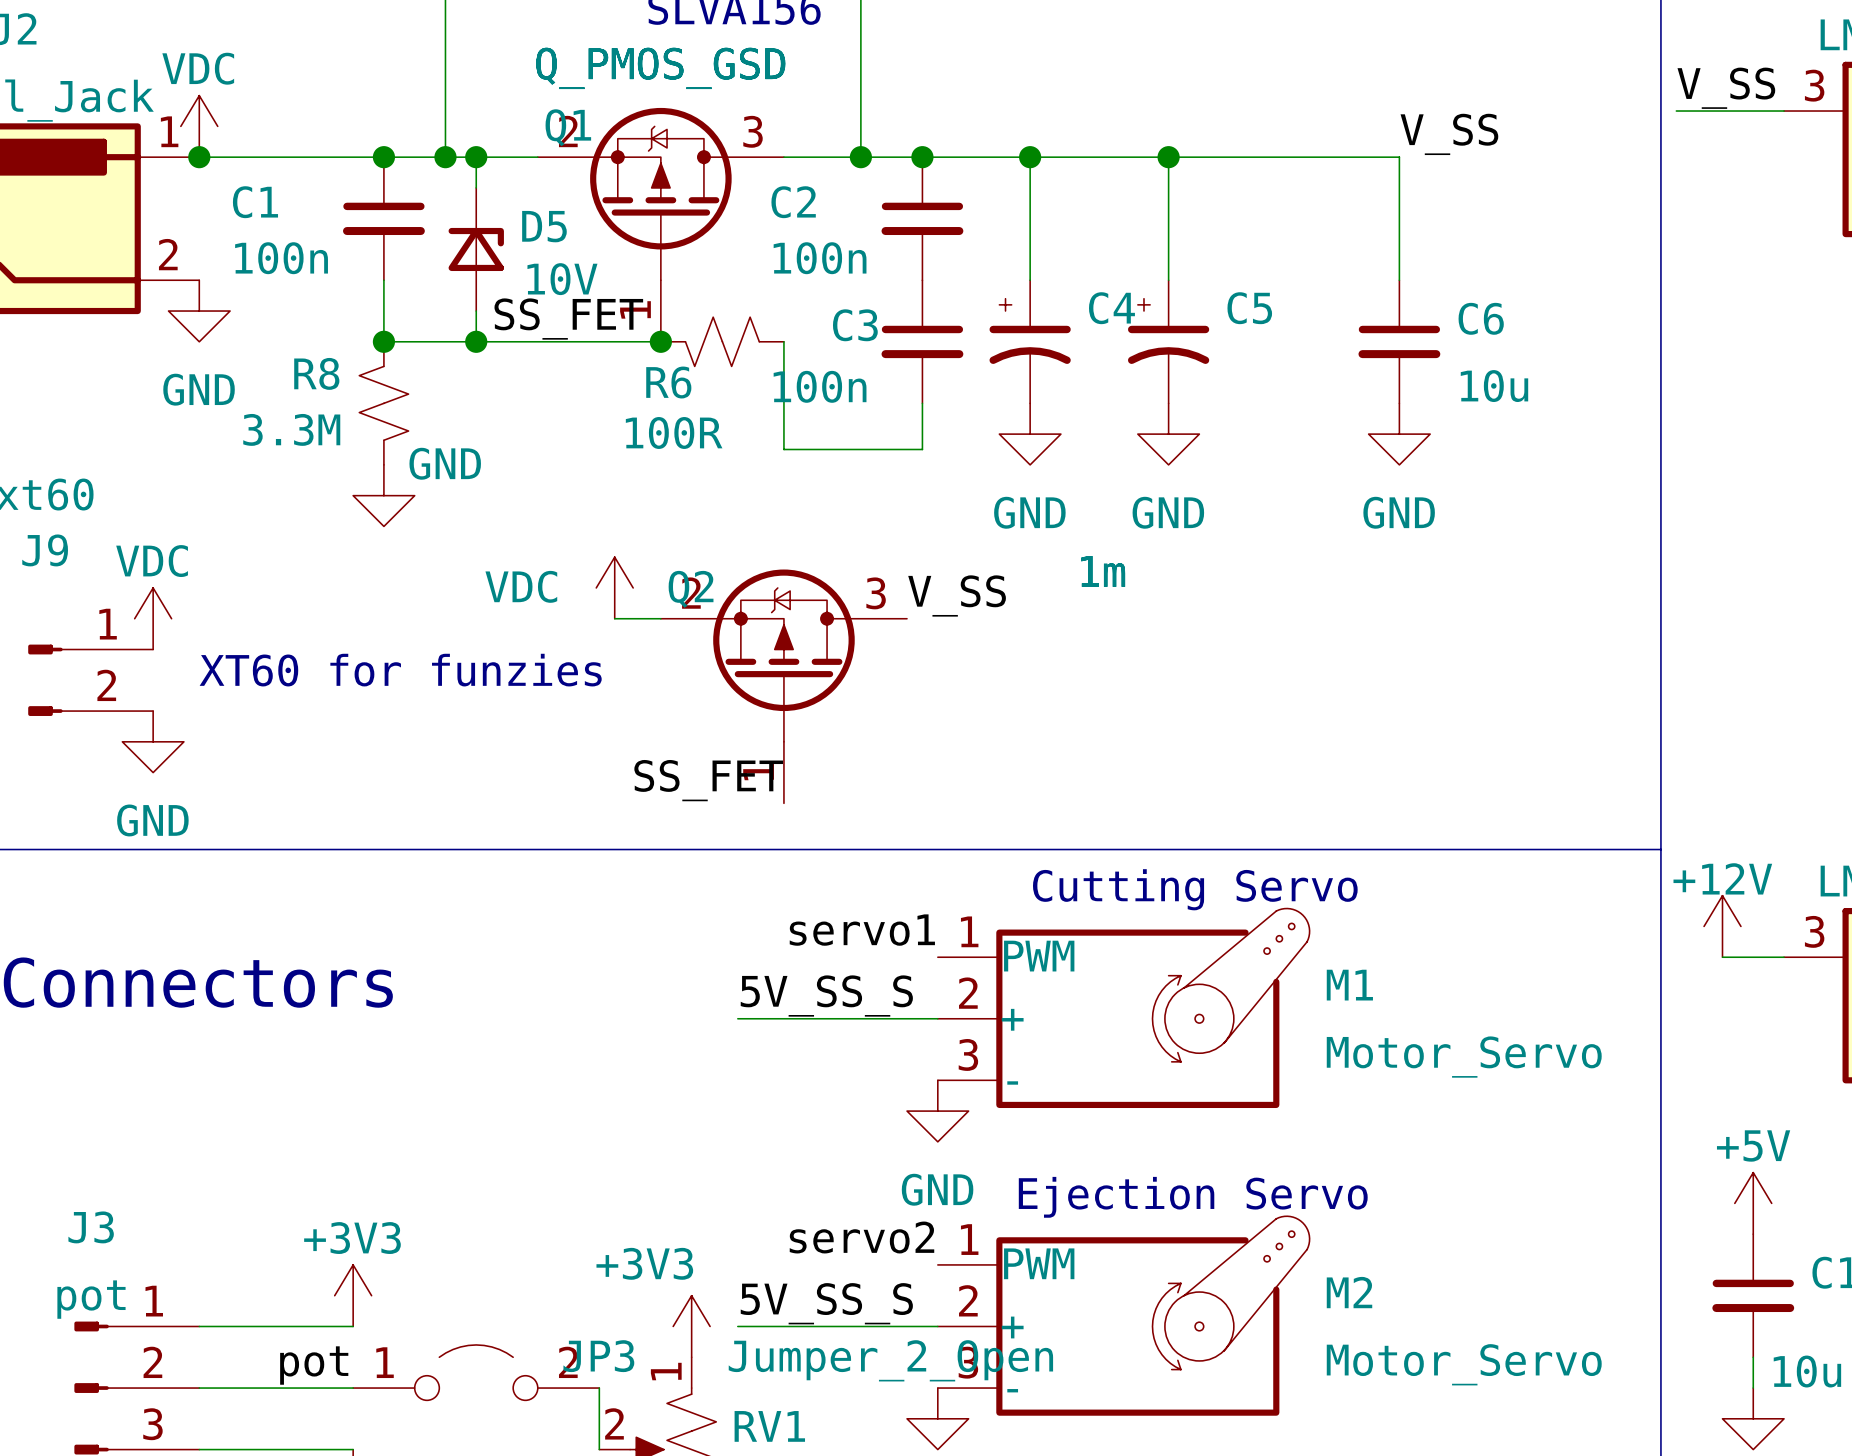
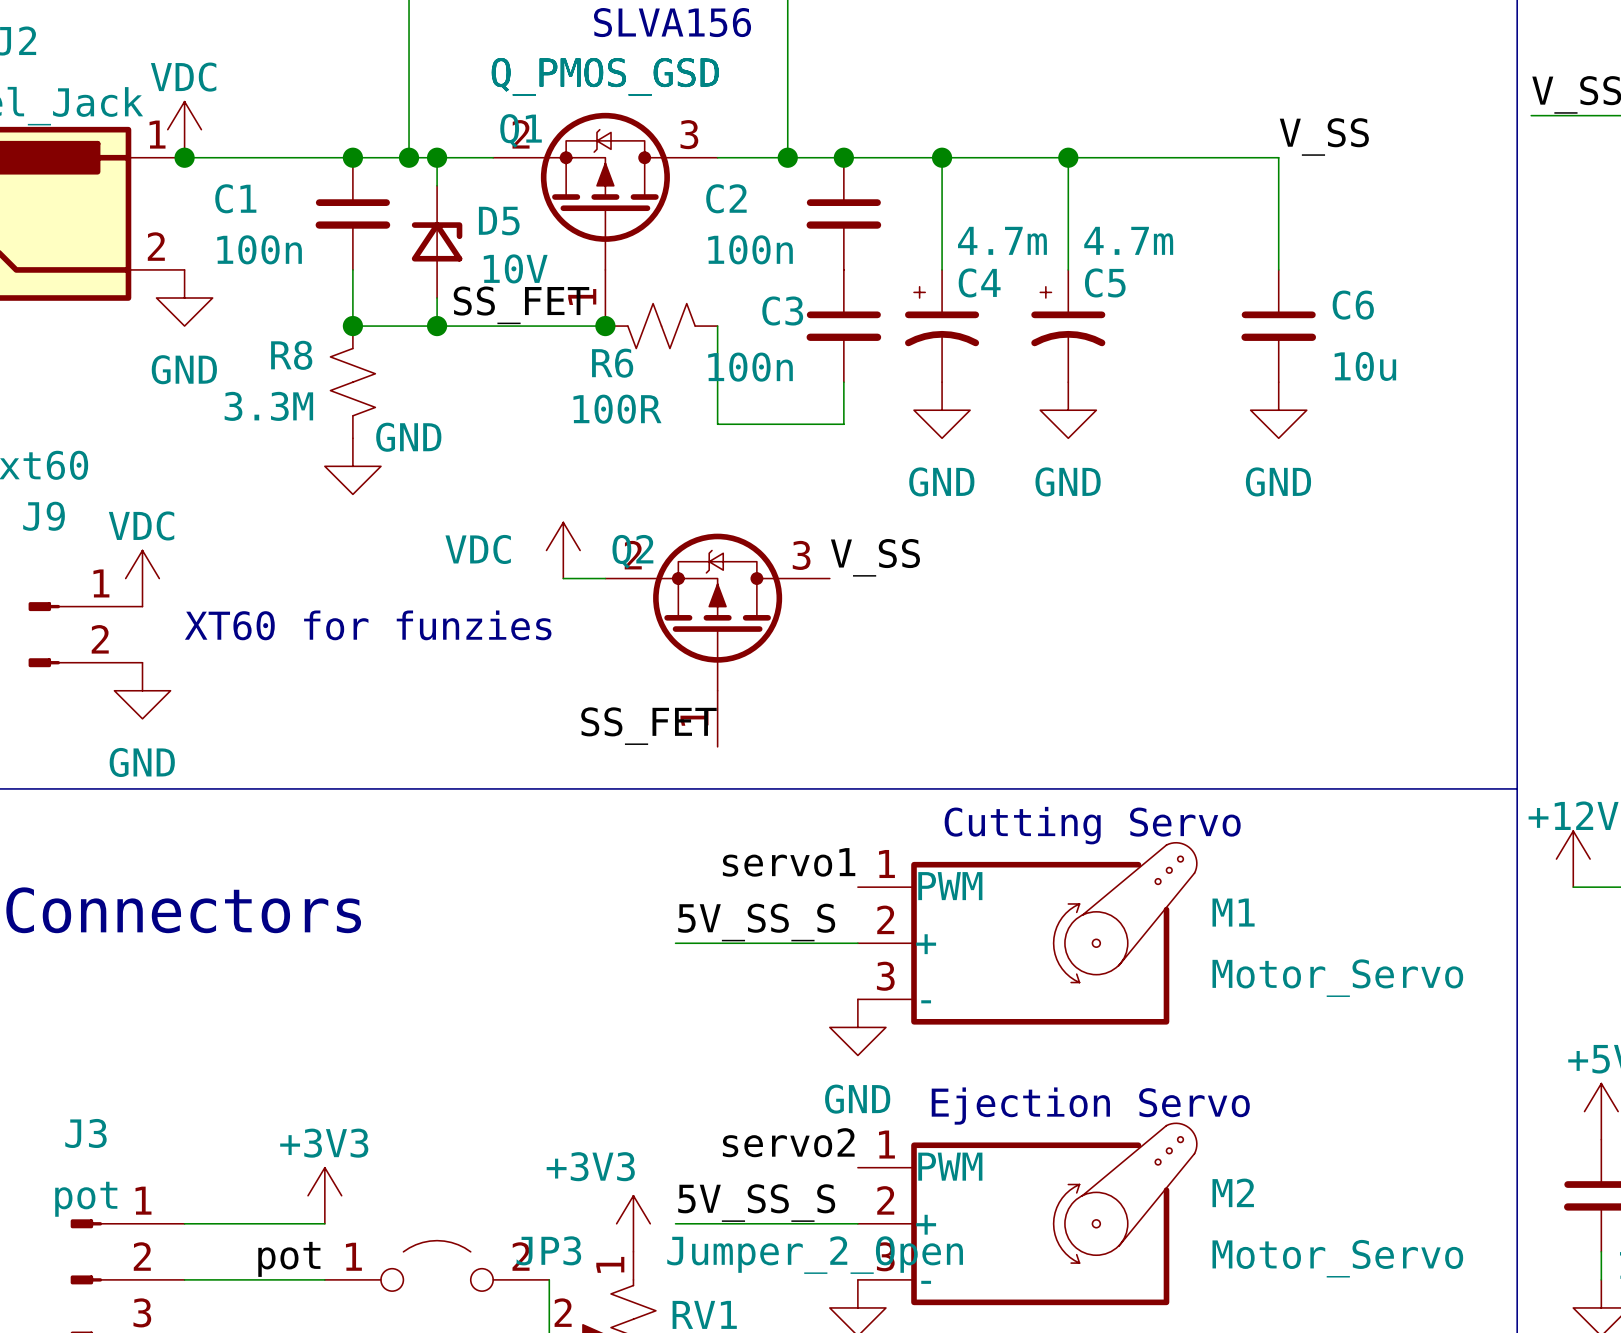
C4 name position: C4 (1111, 308) -> C4 (979, 282)
C5 name position: C5 (1249, 308) -> C5 (1105, 282)
C5 value: 1m (1103, 571) -> 4.7m (1128, 240)
C4 value: 1m (1103, 571) -> 4.7m (1002, 240)

